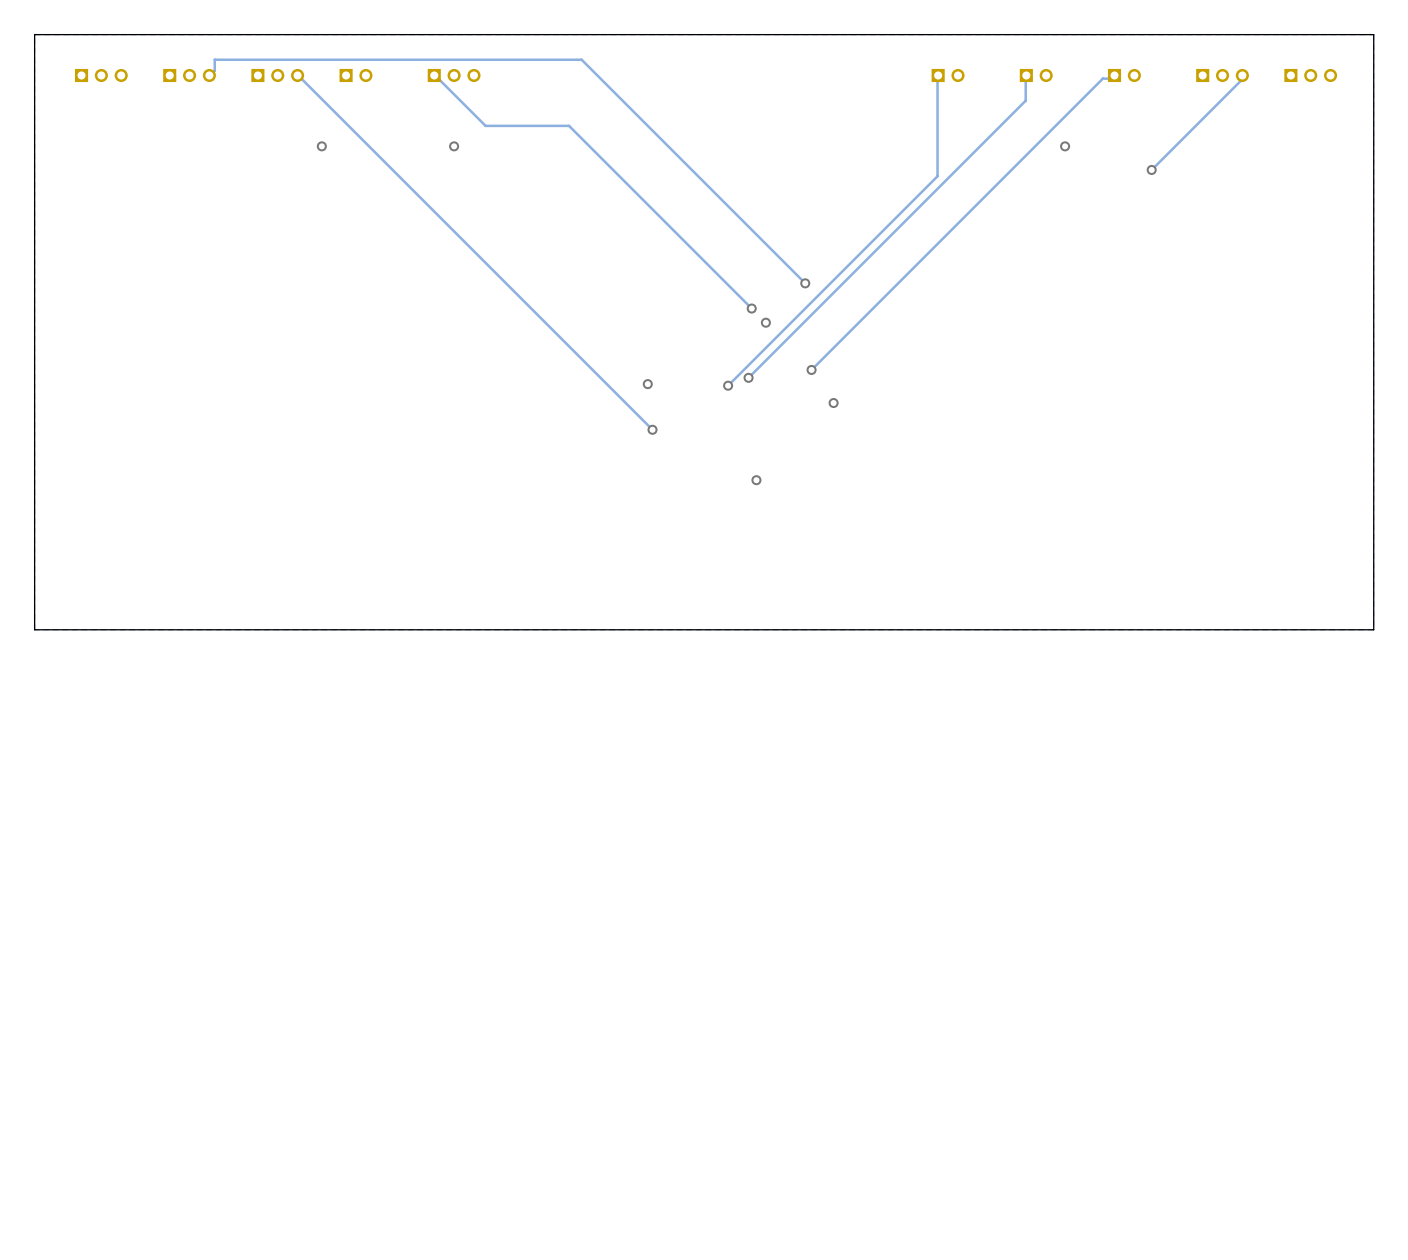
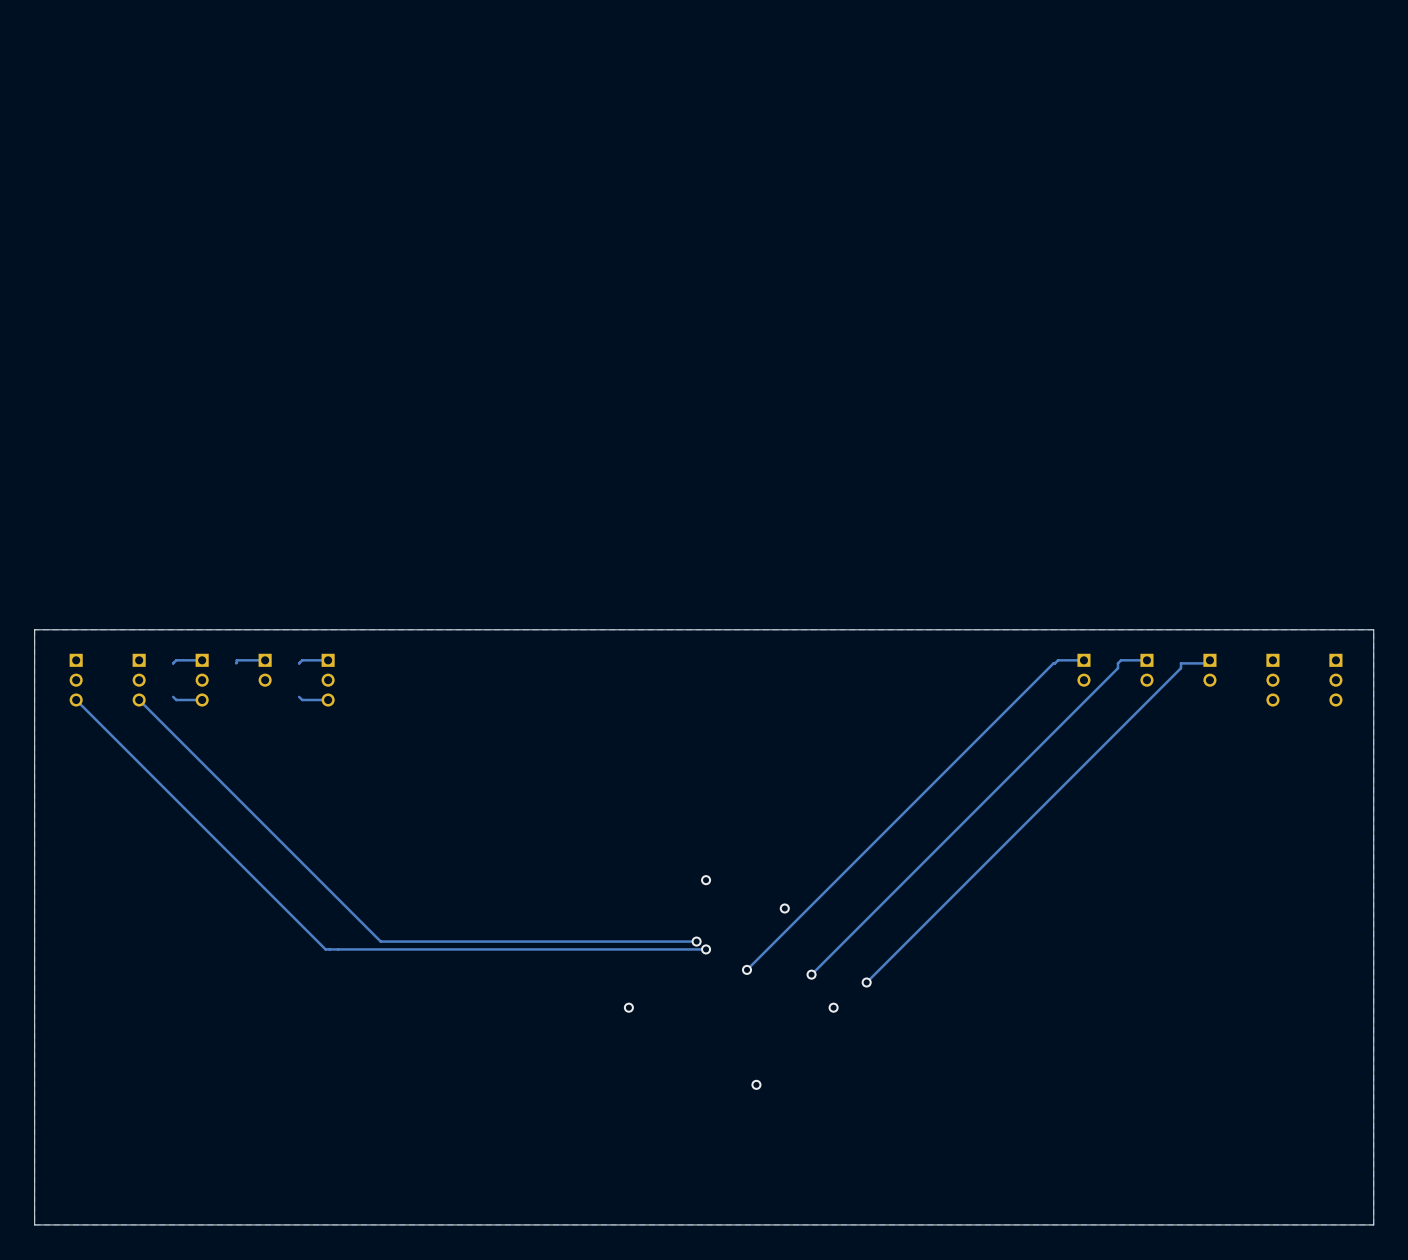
part: (101, 75) -> none
part: (189, 75) -> none
track: (209, 75) (214, 70) (214, 59) (581, 59) (805, 283) -> none
part: (277, 75) -> none
track: (297, 75) (652, 429) -> none
part: (356, 75) -> none
track: (434, 75) (485, 125) (569, 125) (751, 308) -> none
part: (454, 75) -> none
track: (938, 75) (937, 176) (728, 385) -> none
part: (948, 75) -> none
track: (1026, 75) (1025, 100) (748, 377) -> none
part: (1036, 75) -> none
track: (1114, 75) (1113, 78) (1102, 78) (811, 369) -> none
part: (1124, 75) -> none
part: (1222, 75) -> none
track: (1242, 75) (1241, 80) (1151, 169) -> none
part: (1310, 75) -> none
via: (321, 146) -> none
via: (454, 146) -> none
via: (1065, 146) -> none
via: (1151, 169) -> none
via: (805, 283) -> none
via: (751, 308) -> none
via: (765, 322) -> none
via: (811, 369) -> none
via: (748, 377) -> none
via: (647, 384) -> none
via: (728, 385) -> none
via: (833, 403) -> none
via: (652, 429) -> none
via: (756, 480) -> none
board edge: (1373, 629) (1373, 34) (34, 34) (34, 629) -> (1373, 629) (1373, 1224) (34, 1224) (34, 629)
track: none -> (202, 660) (176, 660) (173, 662)
track: none -> (265, 660) (236, 660) (236, 663)
track: none -> (328, 660) (302, 660) (299, 662)
track: none -> (1083, 660) (1058, 660) (1053, 663) (746, 969)
track: none -> (1146, 660) (1121, 660) (1117, 663) (1117, 668) (811, 974)
track: none -> (1209, 660) (1206, 663) (1180, 663) (1180, 668) (866, 982)
part: none -> (265, 670)
part: none -> (1083, 670)
part: none -> (1146, 670)
part: none -> (1209, 670)
part: none -> (76, 680)
part: none -> (139, 680)
part: none -> (202, 680)
part: none -> (328, 680)
part: none -> (1272, 680)
part: none -> (1335, 680)
track: none -> (173, 696) (176, 700) (202, 700)
track: none -> (299, 696) (302, 700) (328, 700)
track: none -> (76, 700) (325, 949) (706, 949)
track: none -> (139, 700) (380, 941) (696, 941)
via: none -> (706, 880)
via: none -> (784, 908)
via: none -> (696, 941)
via: none -> (706, 949)
via: none -> (746, 969)
via: none -> (811, 974)
via: none -> (866, 982)
via: none -> (628, 1007)
via: none -> (833, 1007)
via: none -> (756, 1084)

